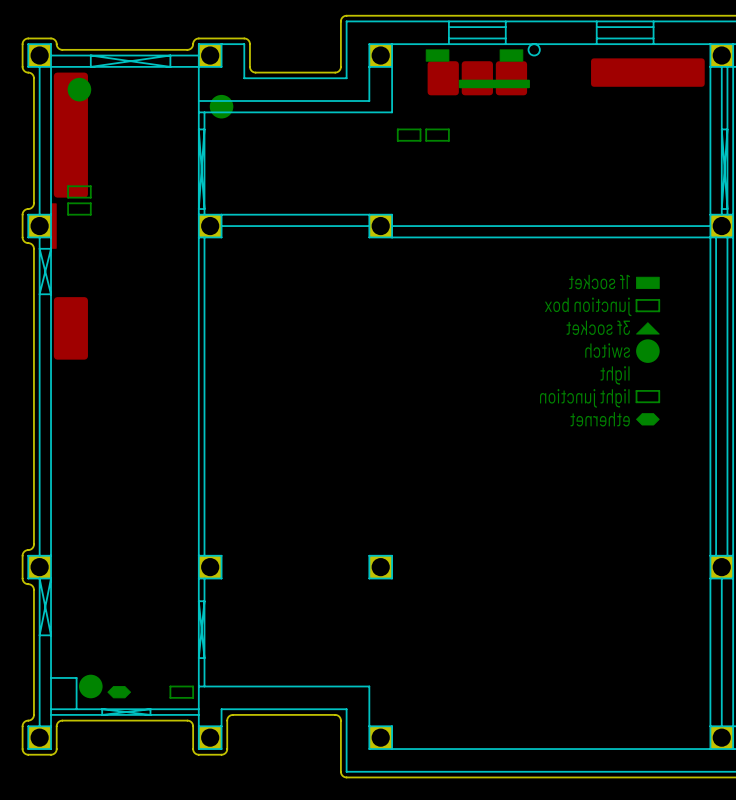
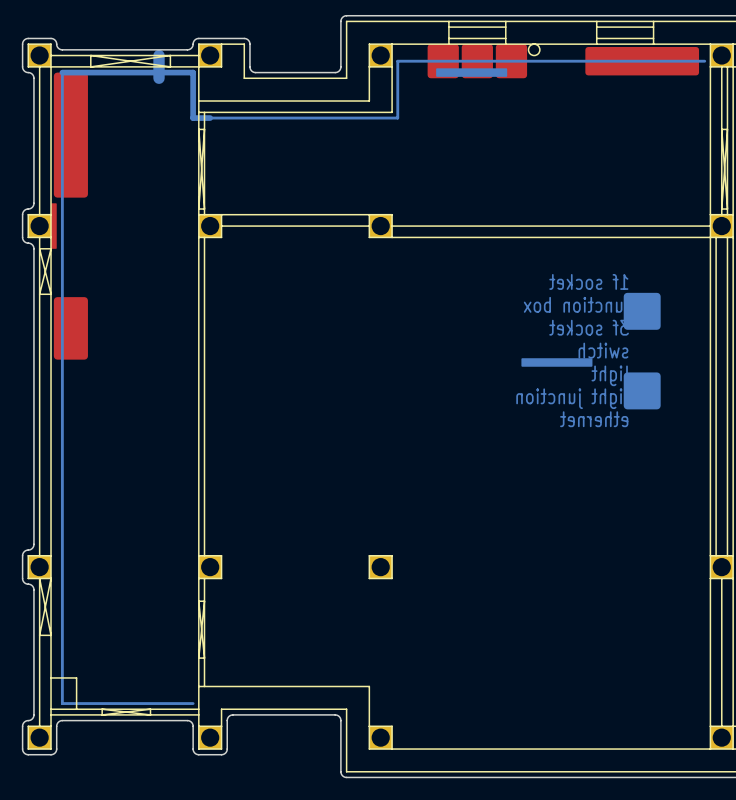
drawing: [425, 49, 450, 62] -> none
drawing: [499, 49, 524, 62] -> none
bottom track: none -> (159, 55) (159, 78)
bottom track: none -> (704, 61) (397, 61) (397, 118) (193, 118) (193, 72) (62, 72) (62, 703) (193, 703)
part position: (647, 72) -> (642, 61)
drawing: [67, 77, 92, 102] -> none
part position: (443, 78) -> (443, 61)
part position: (477, 78) -> (477, 61)
part position: (511, 78) -> (511, 61)
part position: (494, 83) -> (471, 72)
drawing: [209, 94, 234, 119] -> none
bottom track: (420, 129) (397, 129) (397, 140) (420, 140) (420, 129) -> none
bottom track: (448, 129) (426, 129) (426, 140) (448, 140) (448, 129) -> none
bottom track: (90, 186) (90, 197) (68, 197) (68, 186) (90, 186) -> none
bottom track: (90, 203) (68, 203) (68, 214) (90, 214) (90, 203) -> none
drawing: [636, 276, 660, 290] -> none
bottom track: (659, 299) (659, 311) (636, 311) (636, 299) (659, 299) -> none
part: none -> (642, 311)
drawing: [636, 322, 660, 363] -> none
part: none -> (556, 362)
part: none -> (642, 390)
bottom track: (659, 390) (636, 390) (636, 402) (659, 402) (659, 390) -> none
drawing: [636, 413, 660, 426] -> none
drawing: [79, 674, 132, 699] -> none
bottom track: (193, 686) (170, 686) (170, 697) (193, 697) (193, 686) -> none

